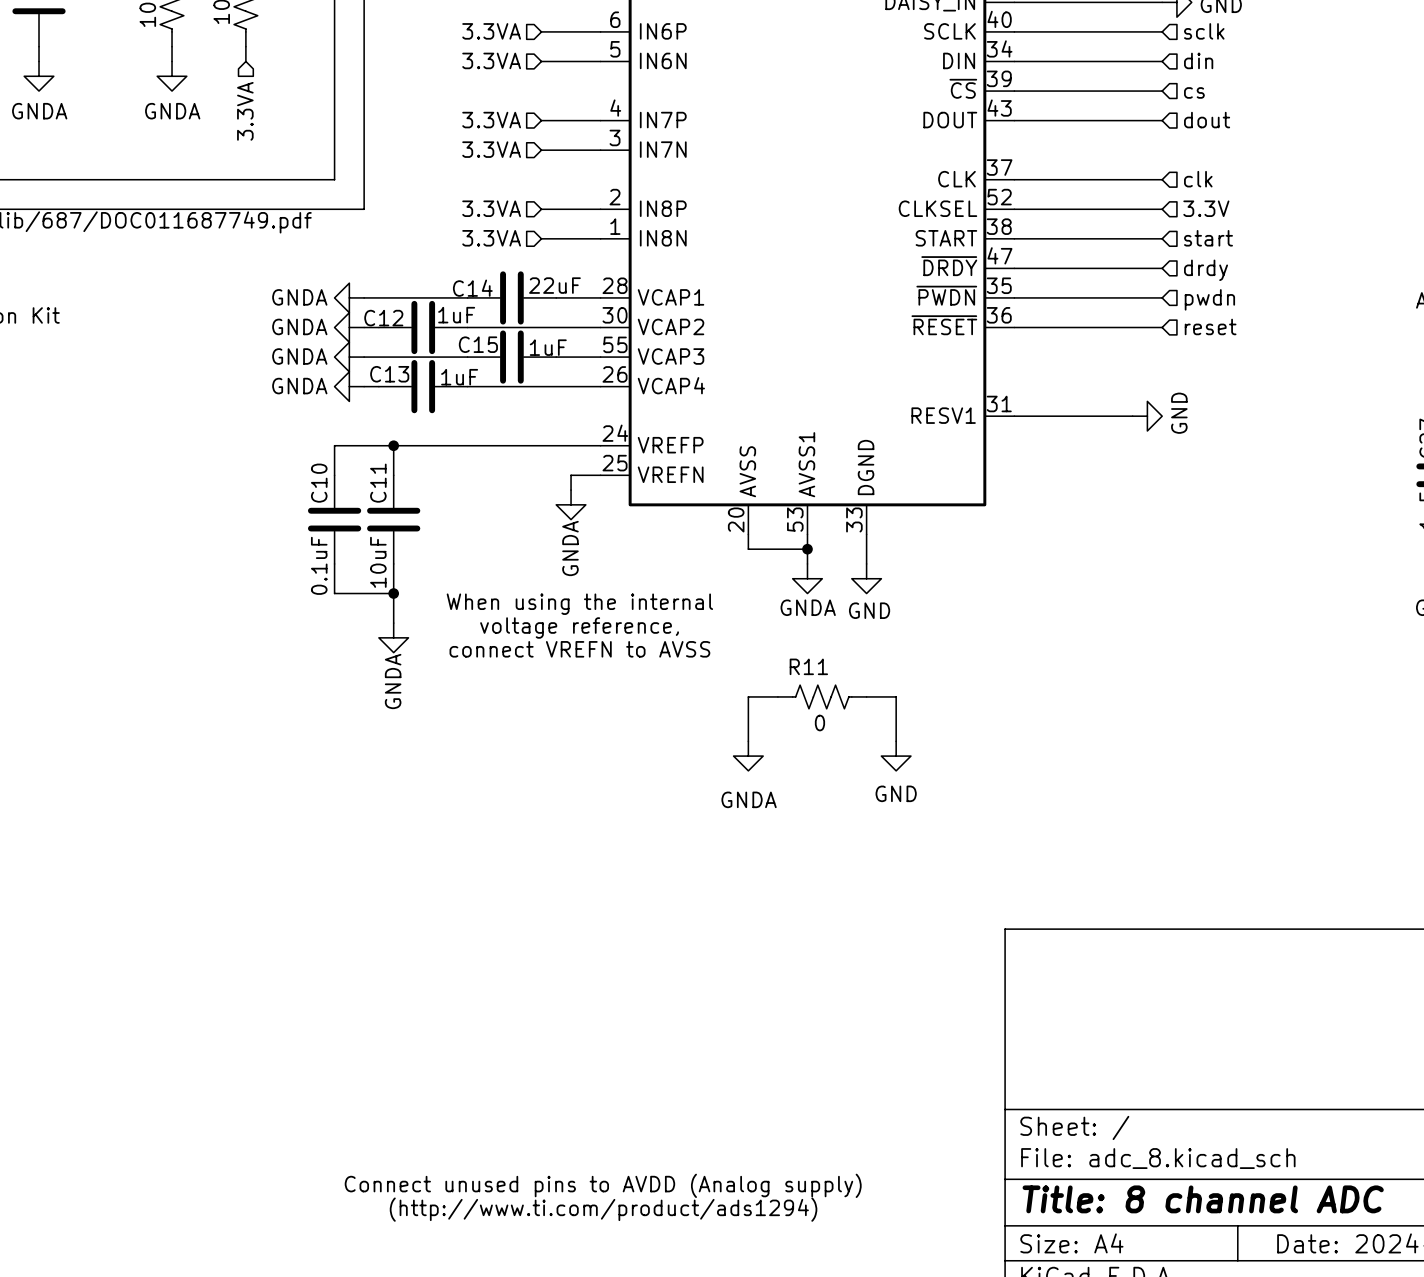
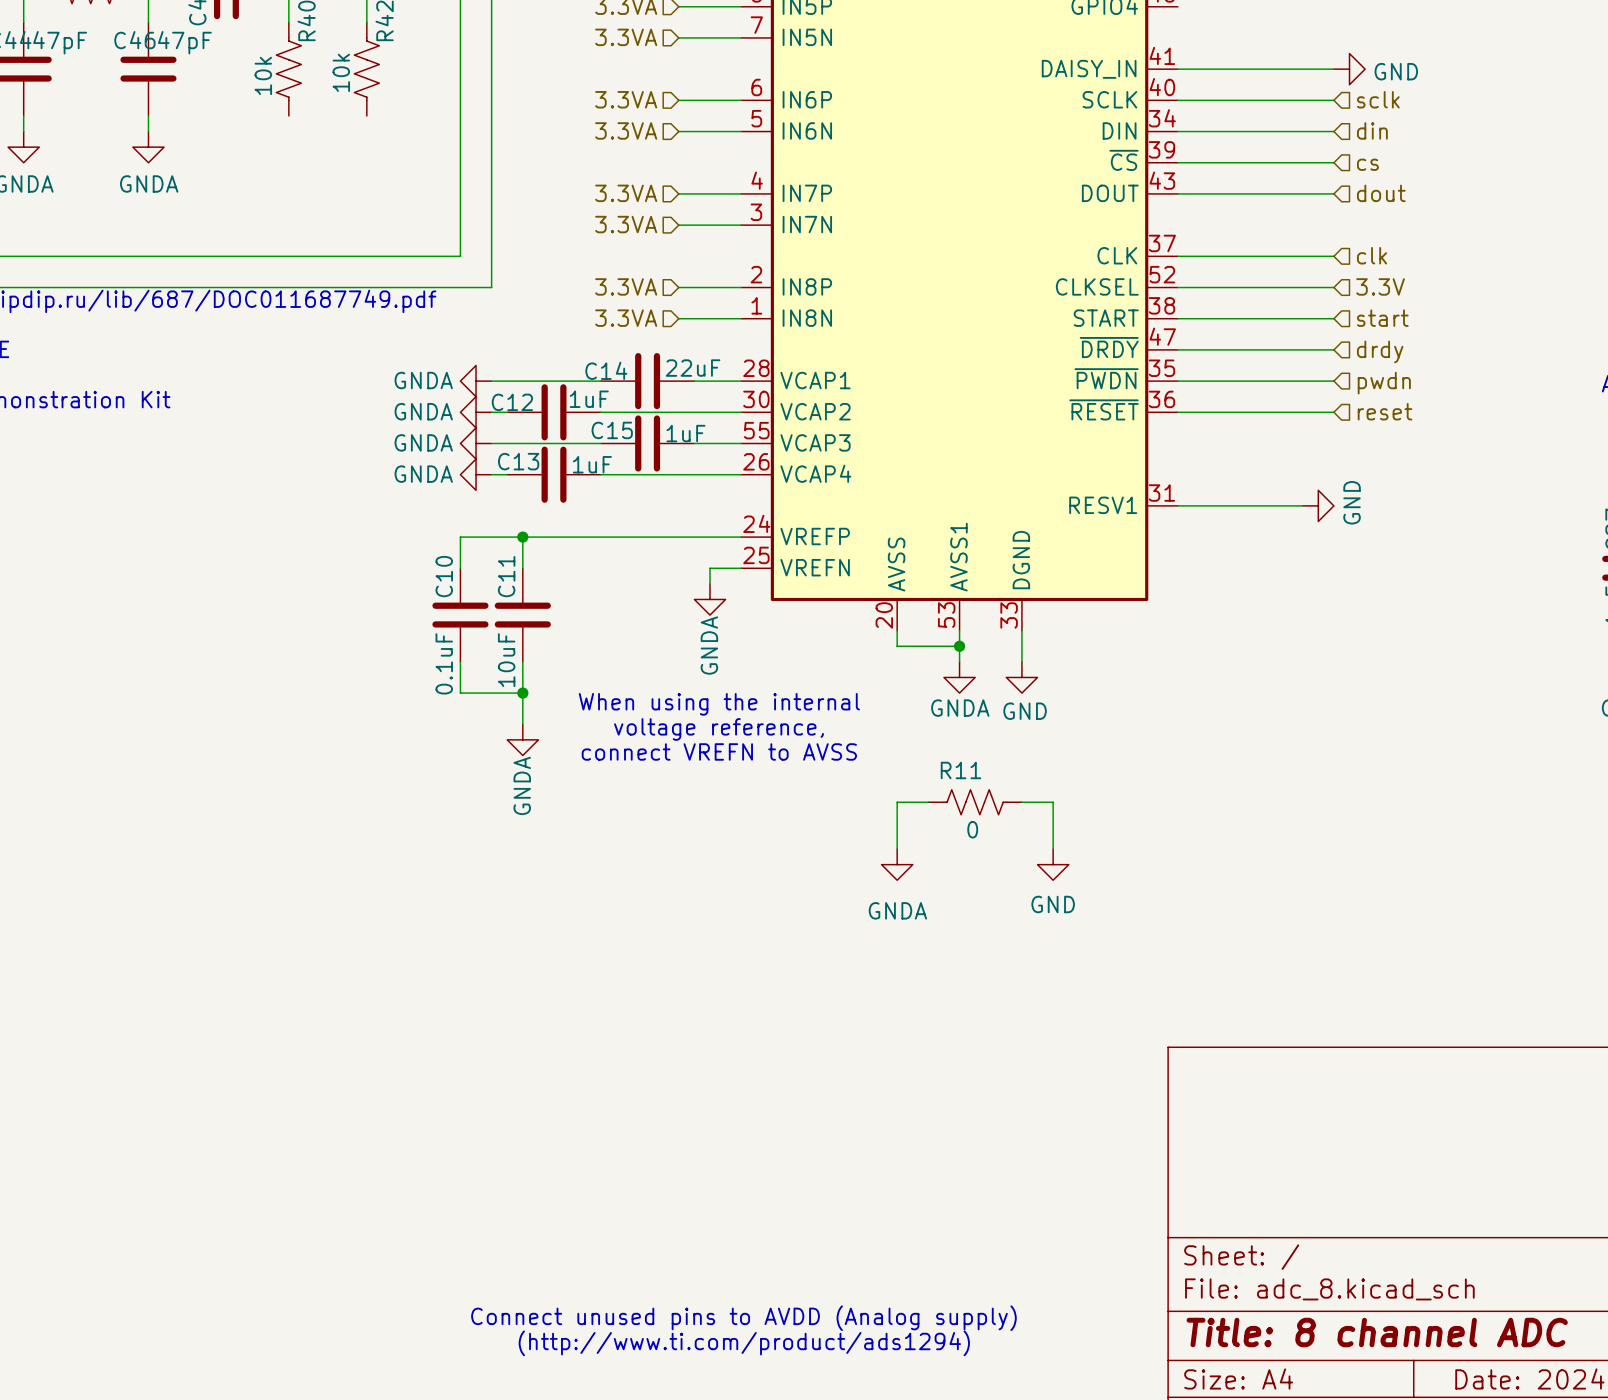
wire: (172, 46) (172, 61) -> none
wire: (245, 46) (245, 61) -> none
power symbol: GNDA (172, 76) -> none
hierarchical label: 3.3VA (245, 111) -> none

